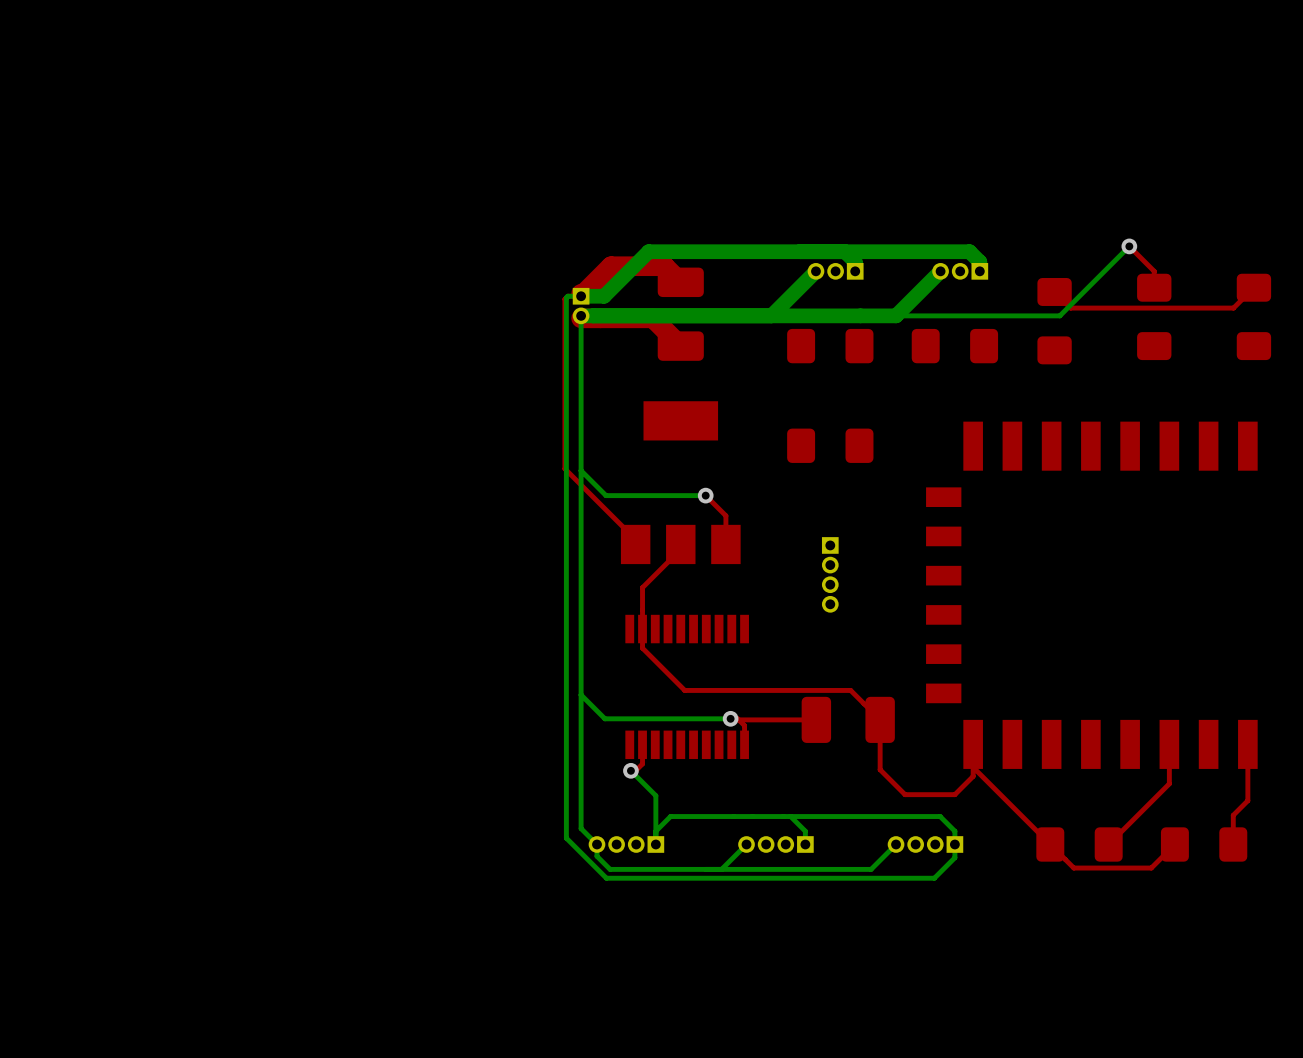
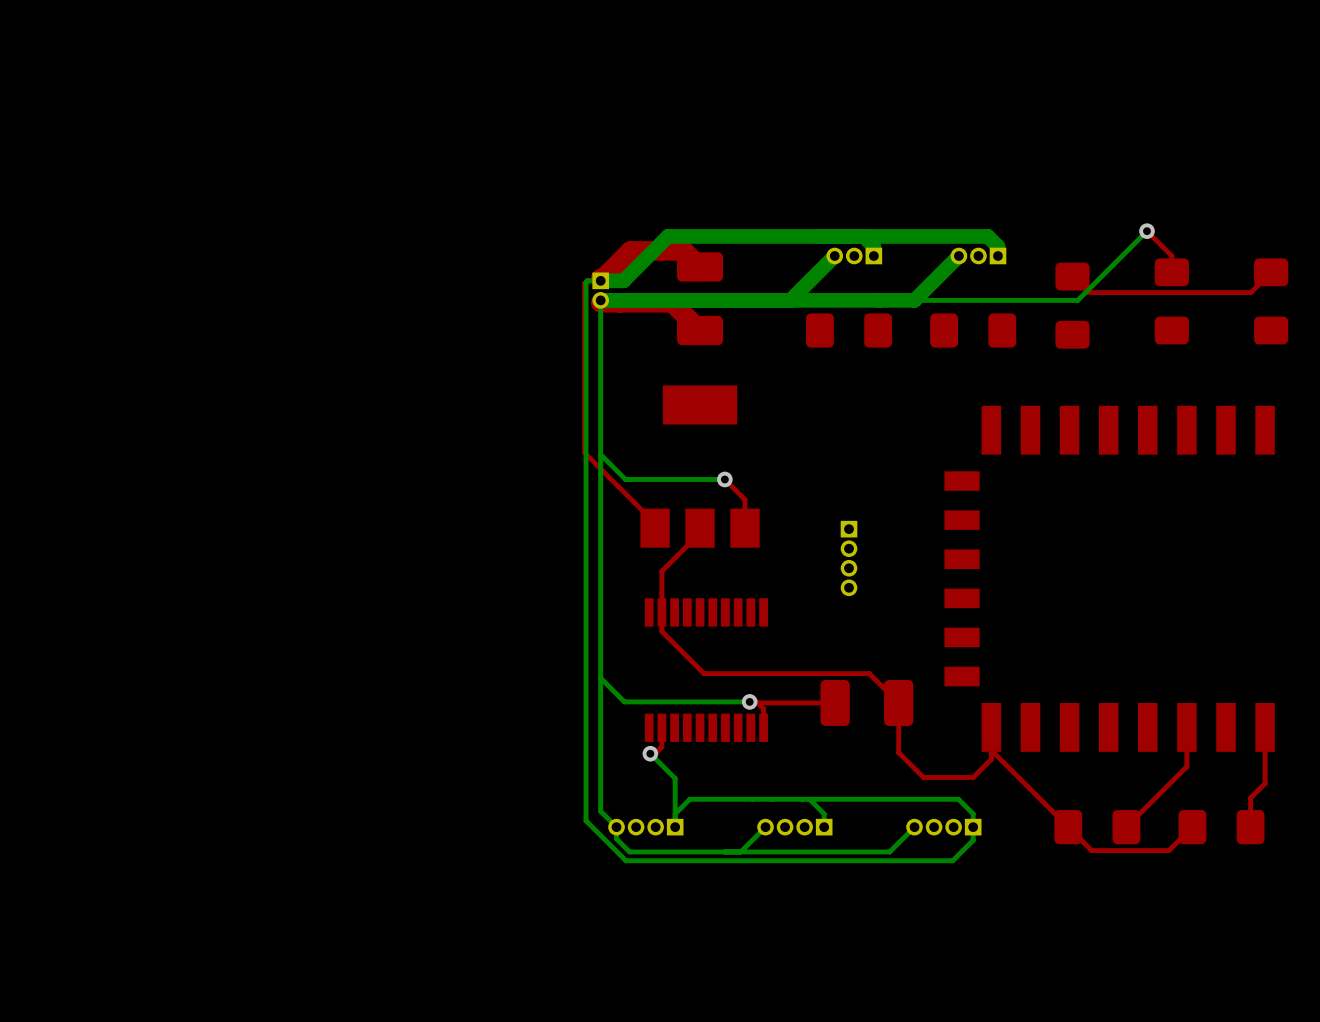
part: (830, 445) -> none

